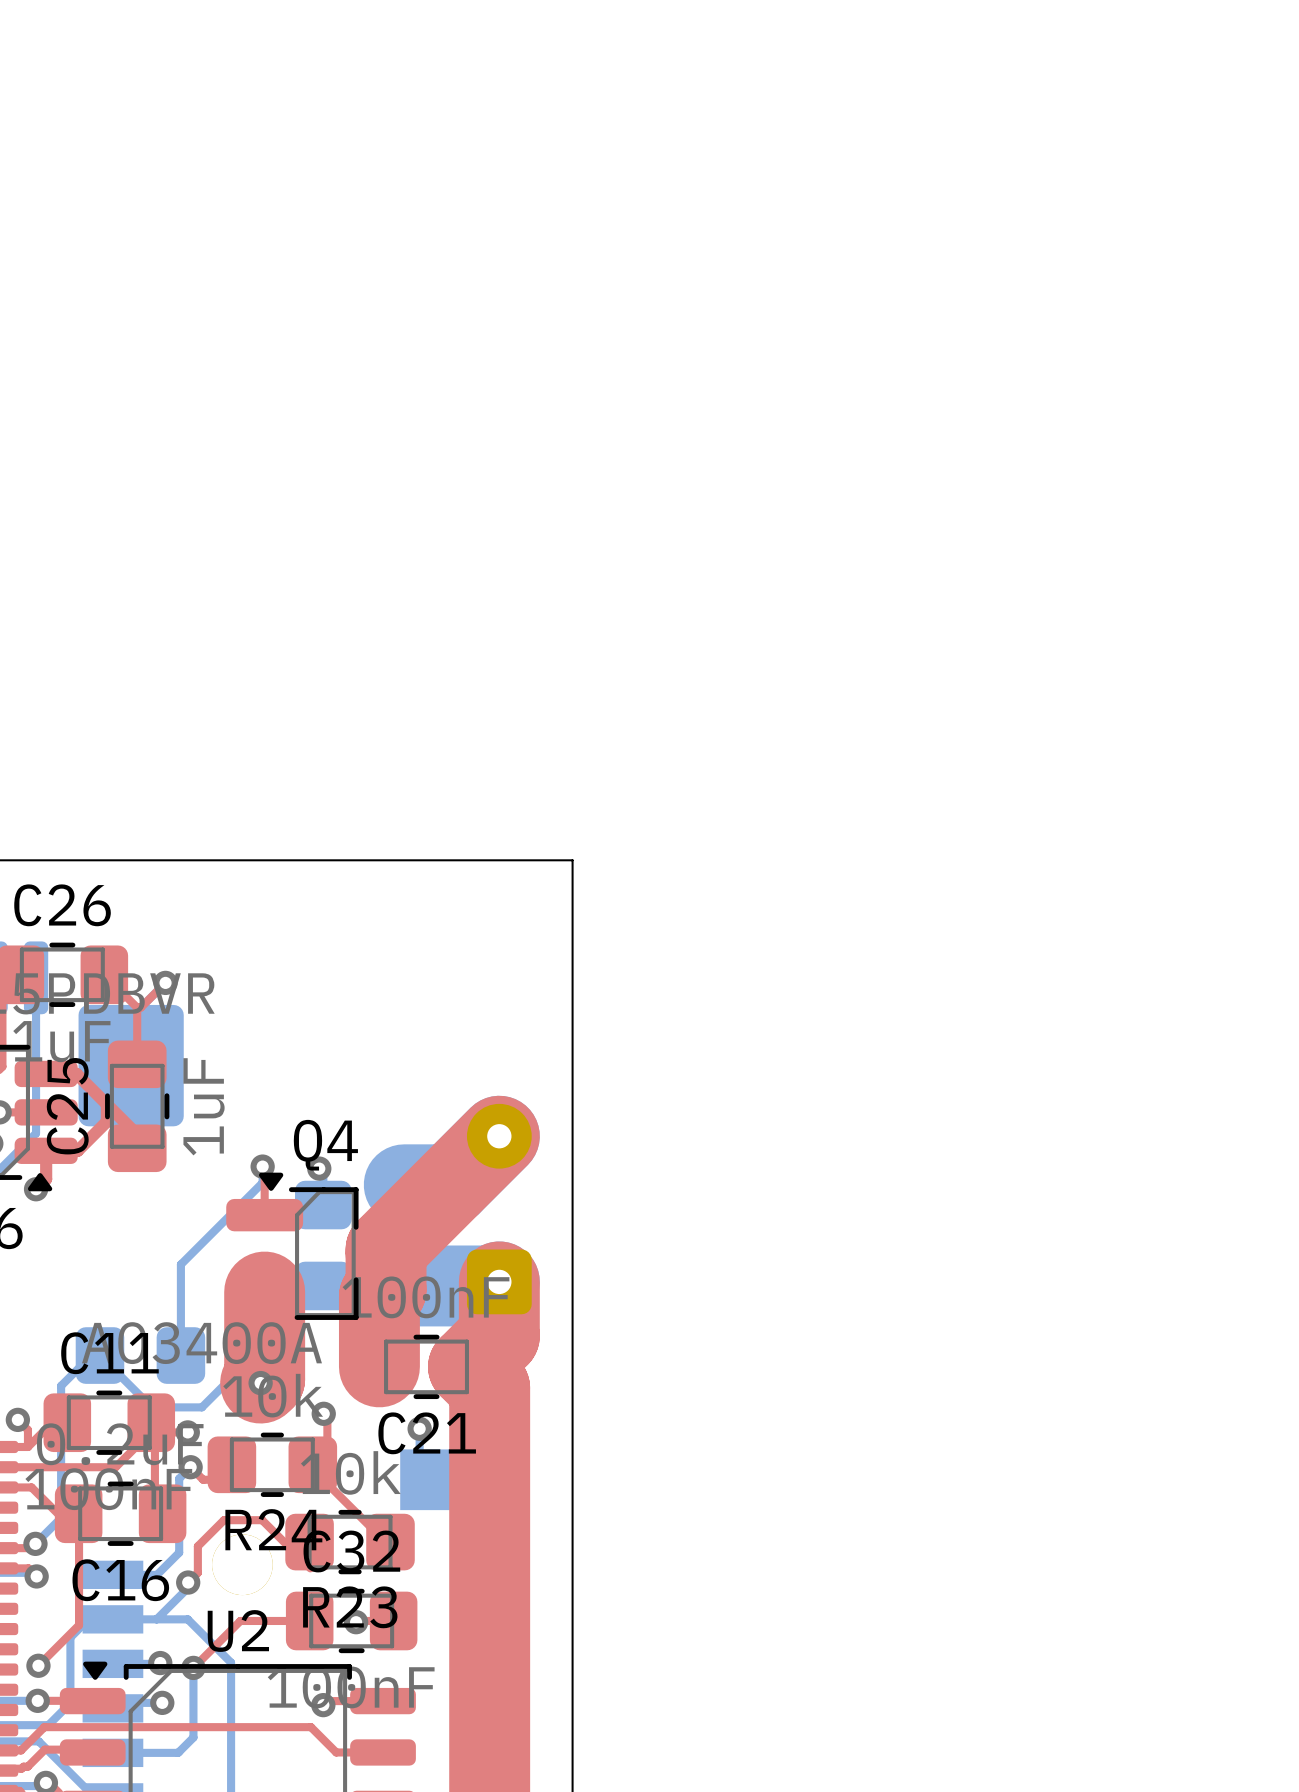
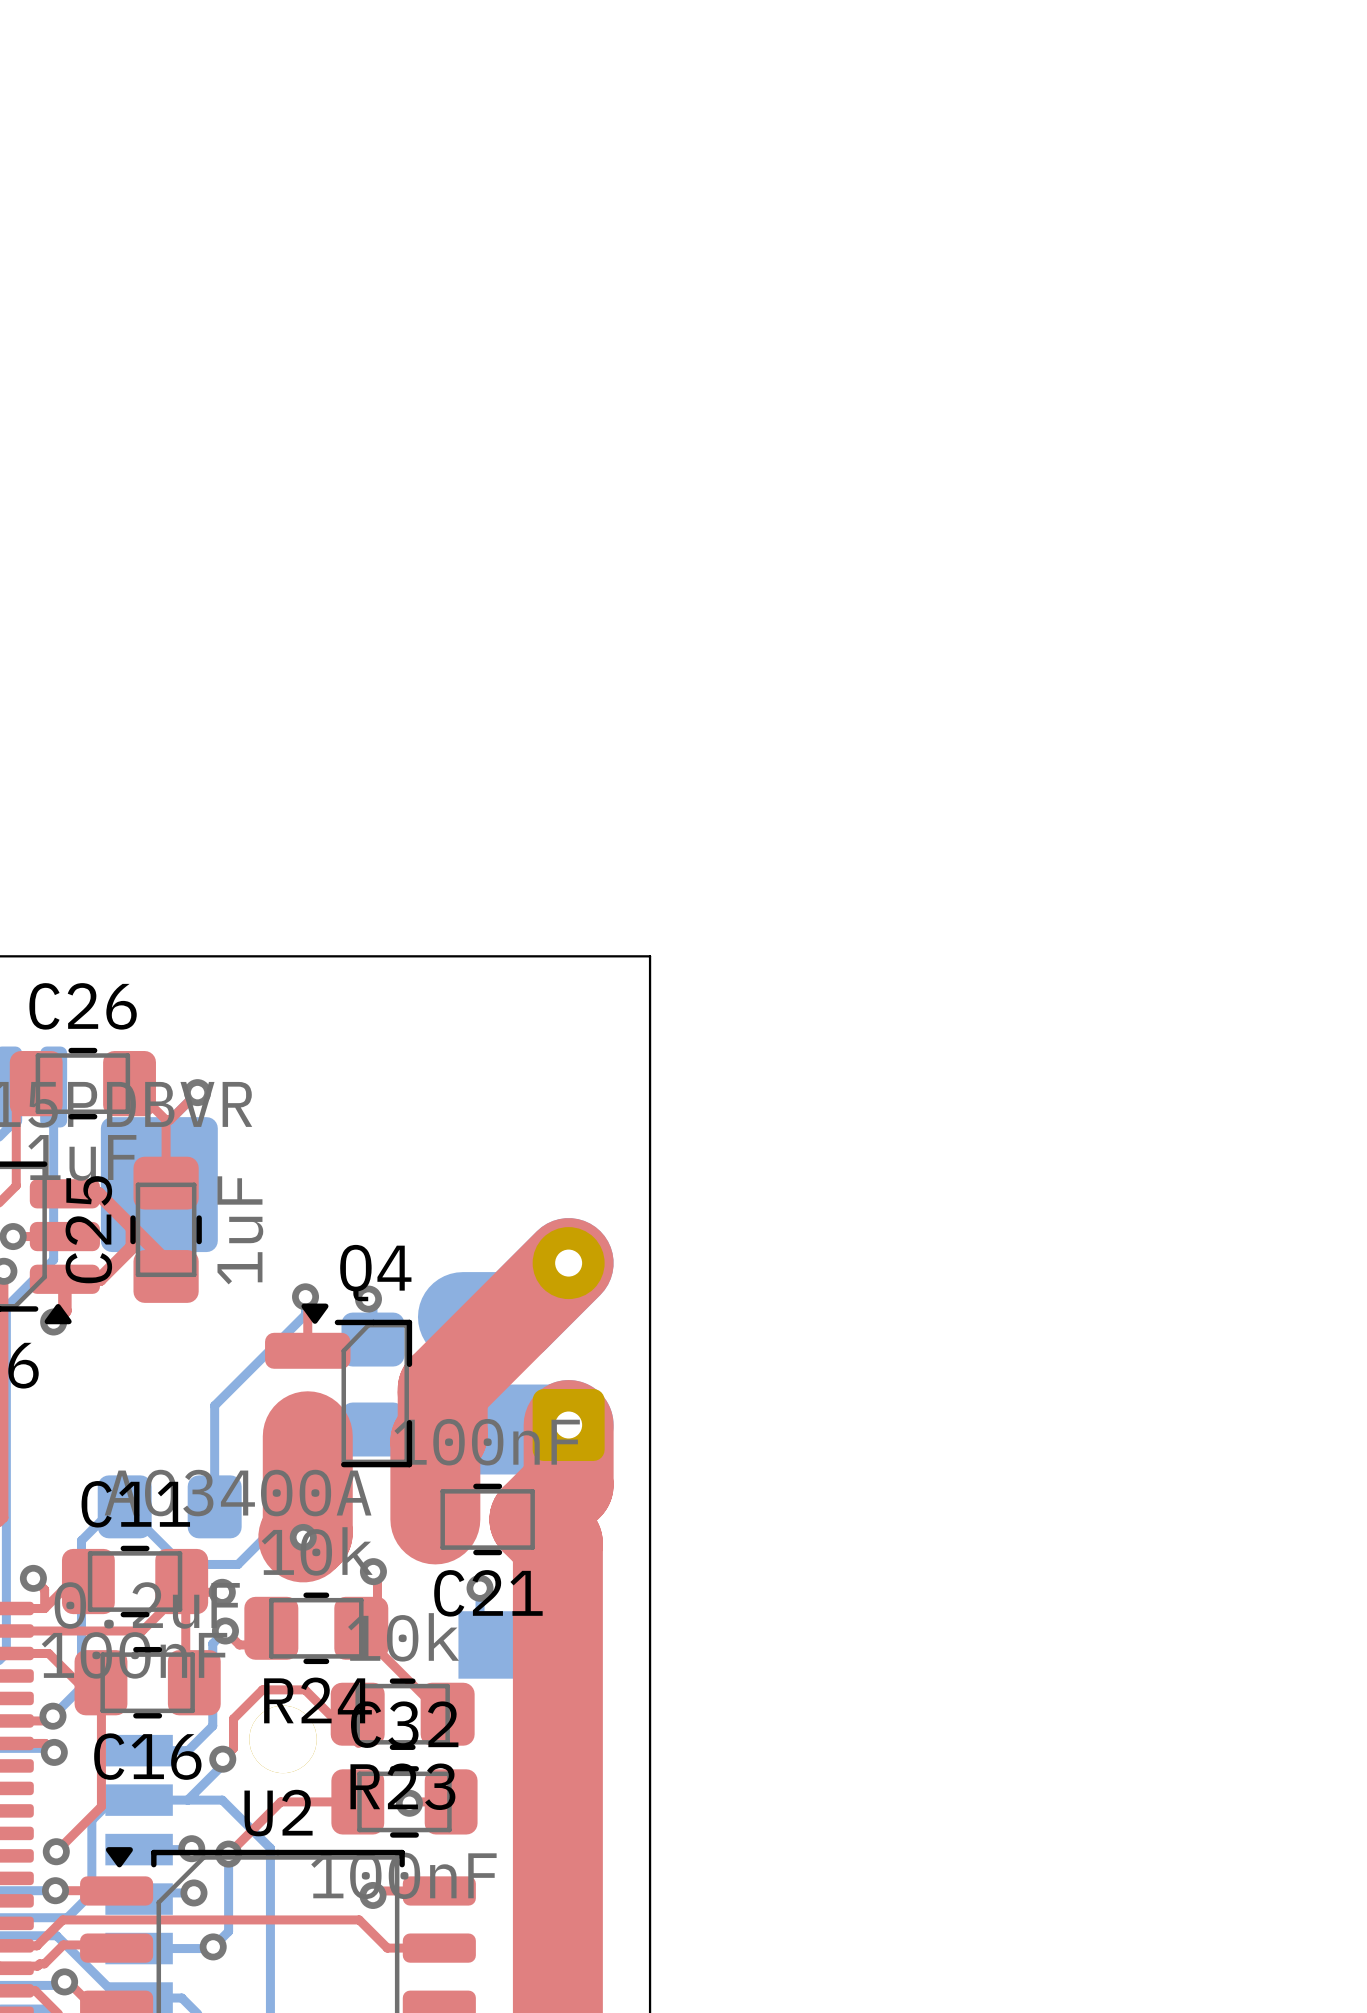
via: none -> (213, 1946)

